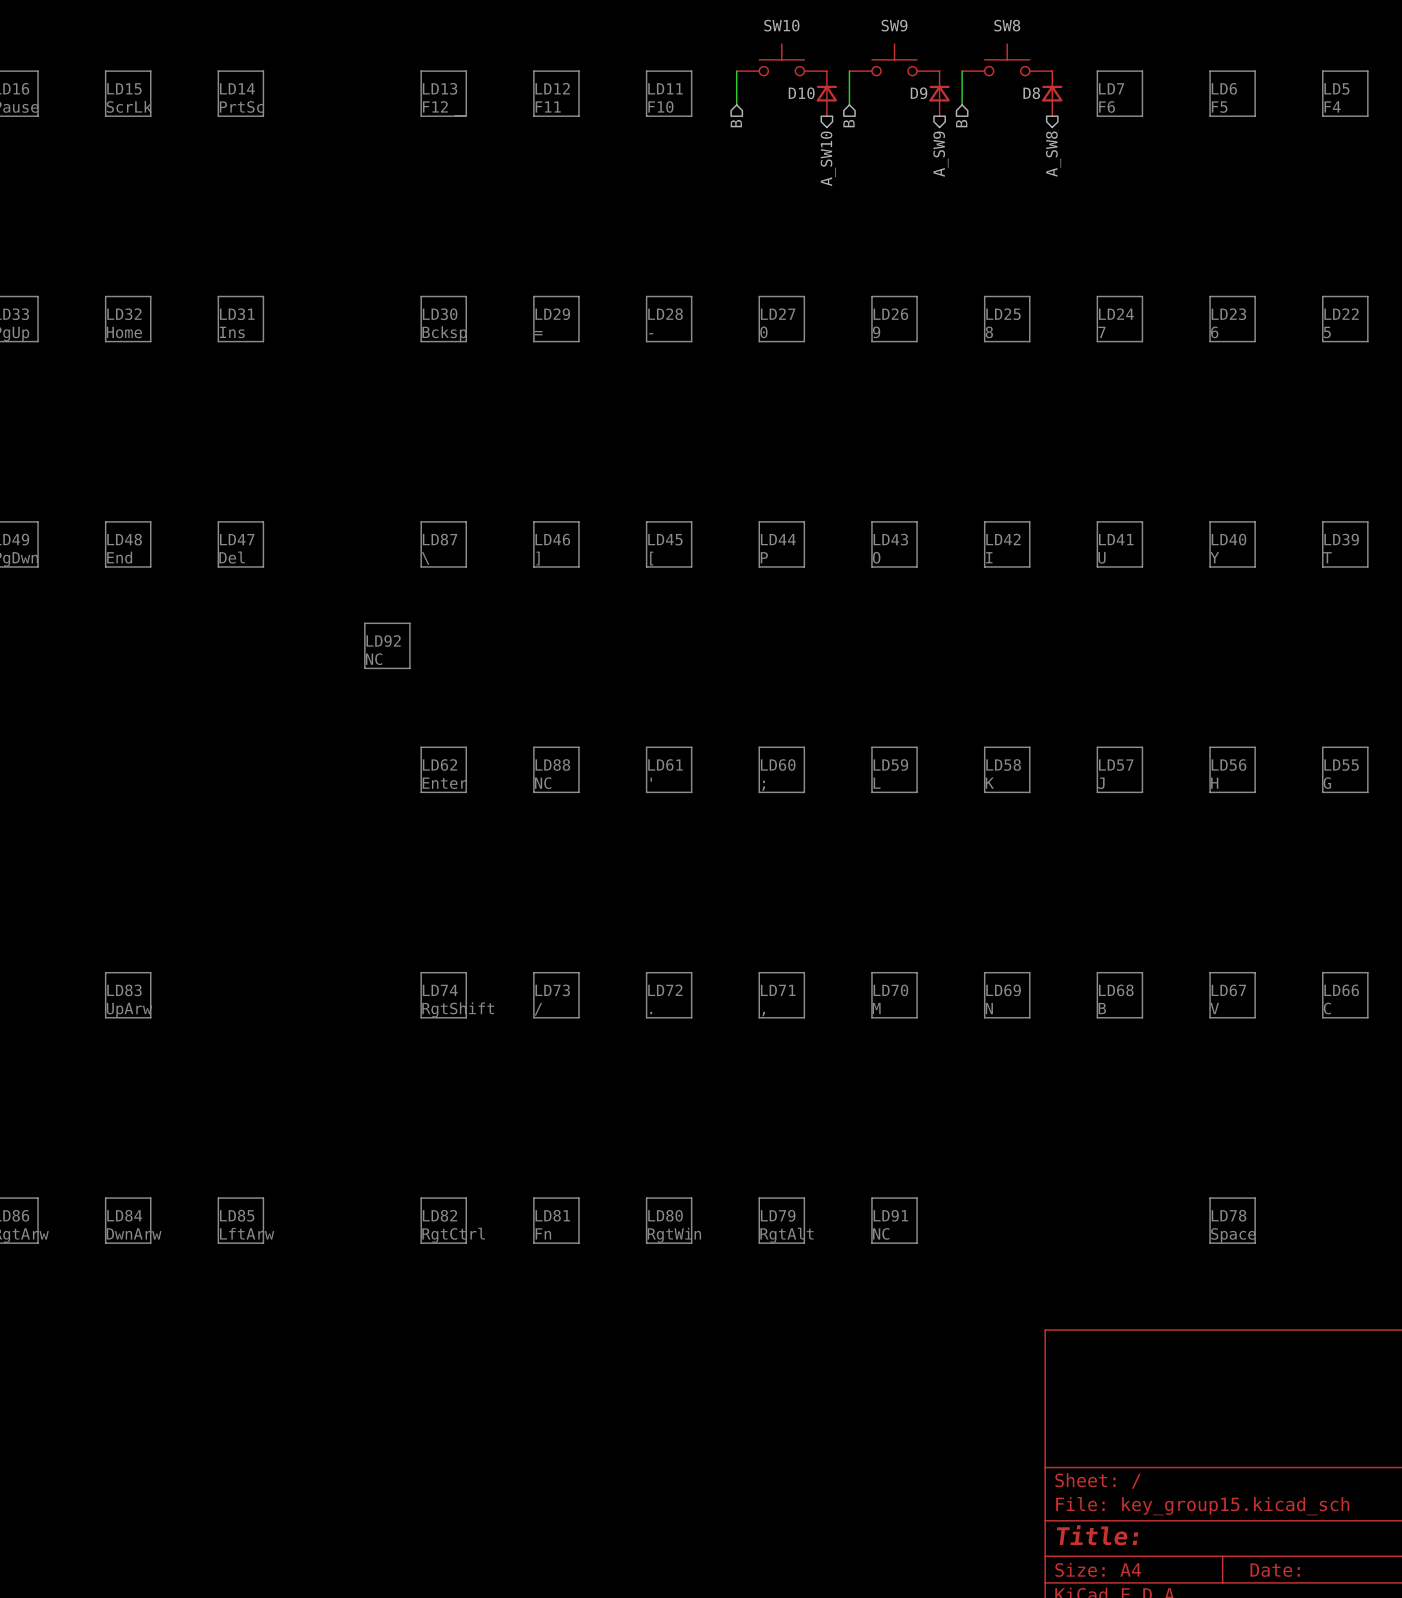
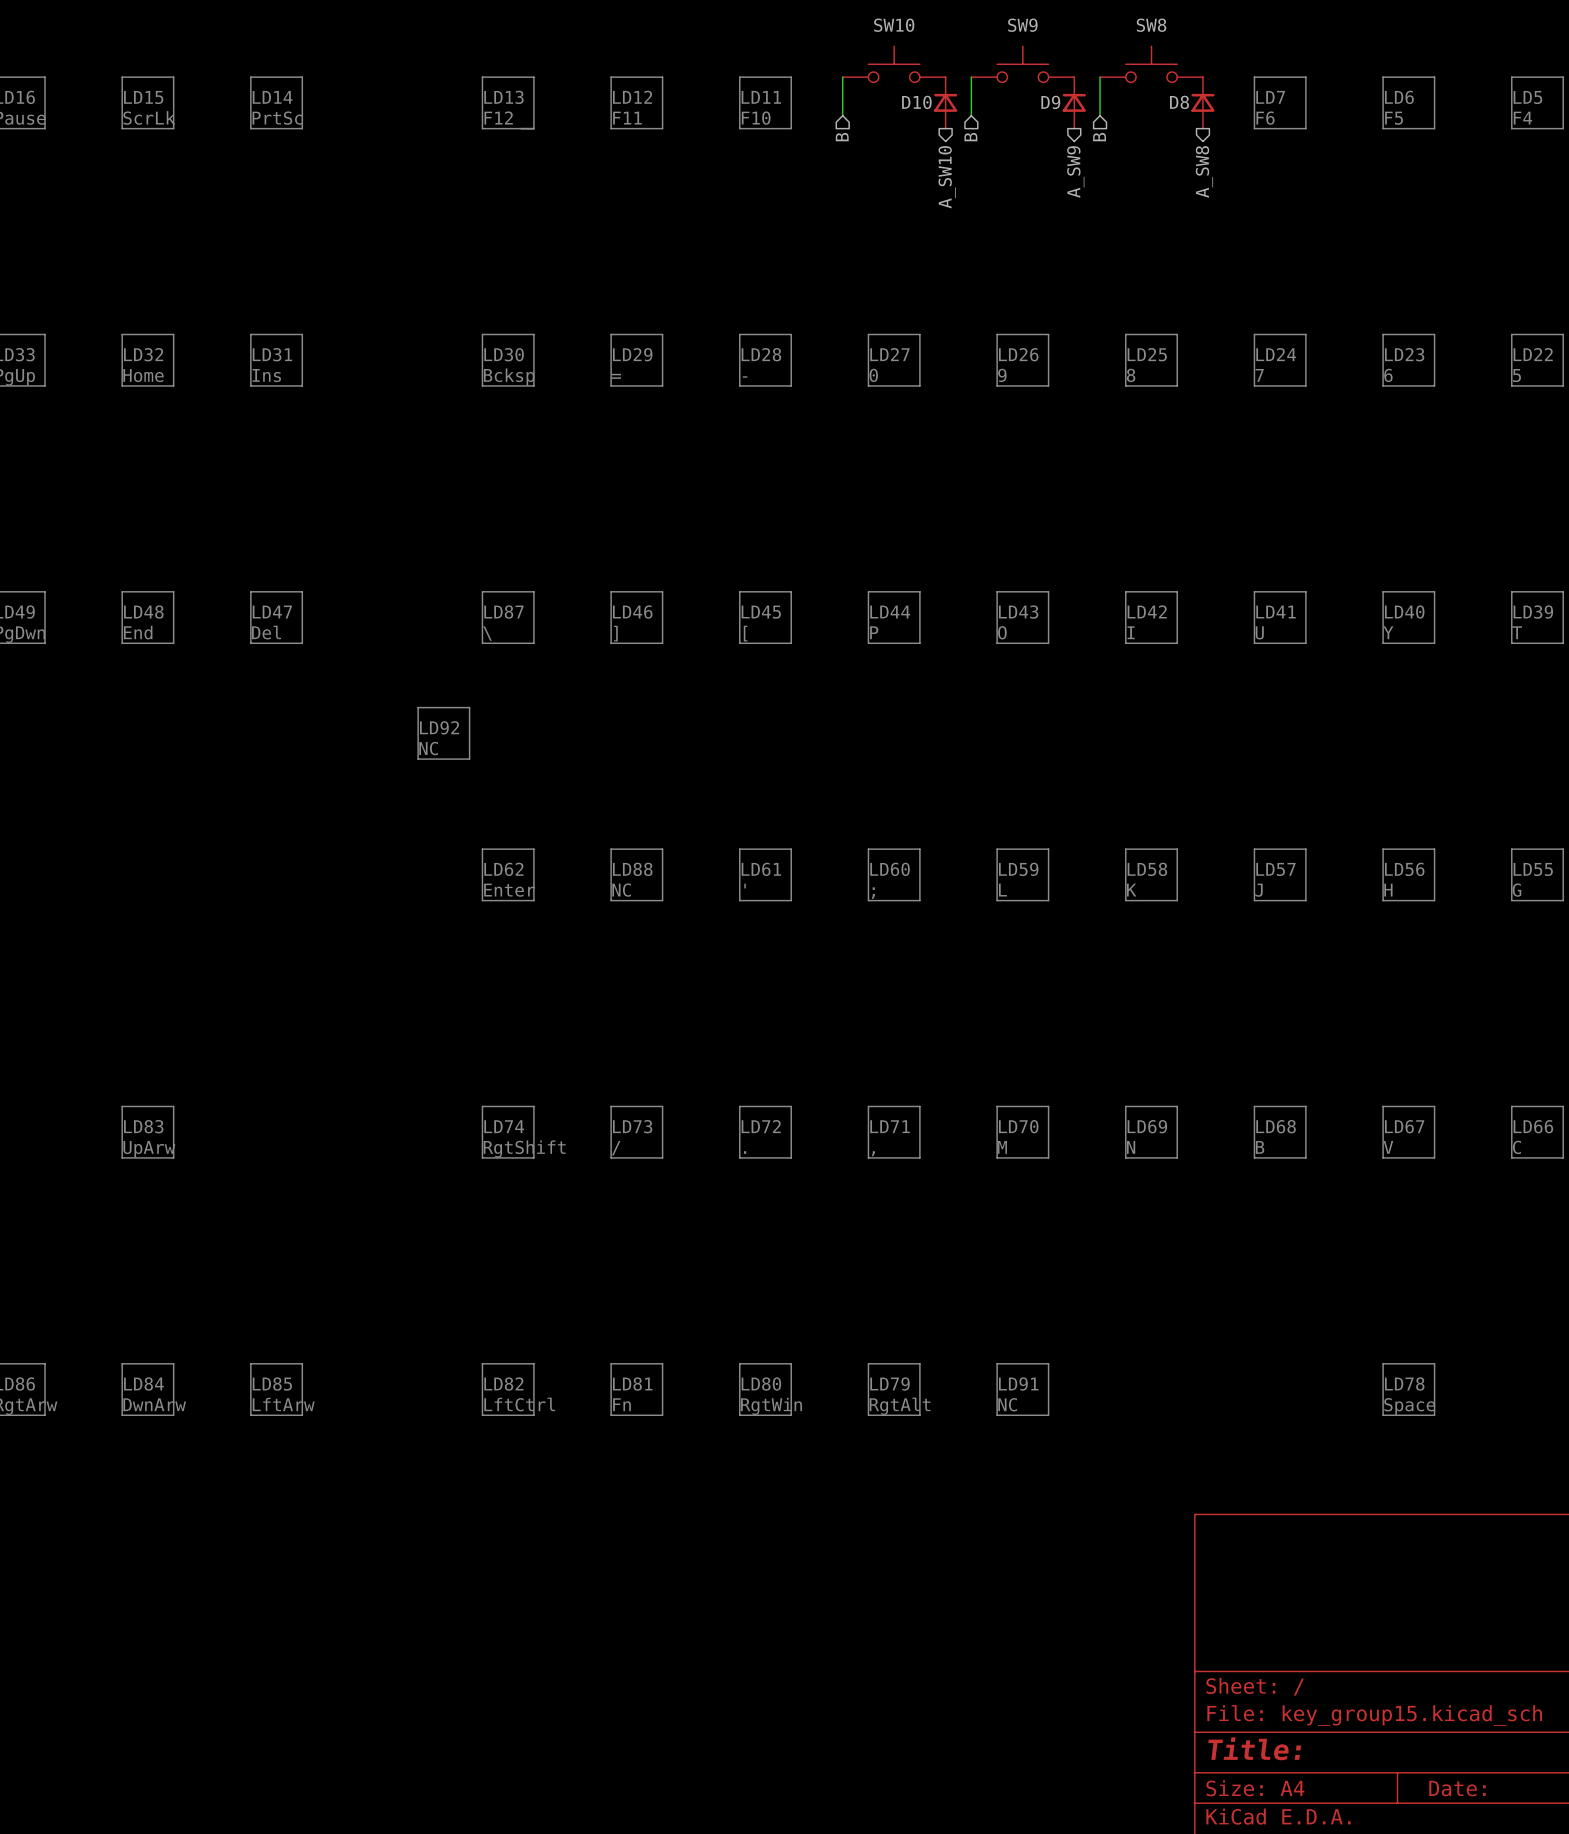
text: RgtCtrl (453, 1235) -> LftCtrl (519, 1404)

